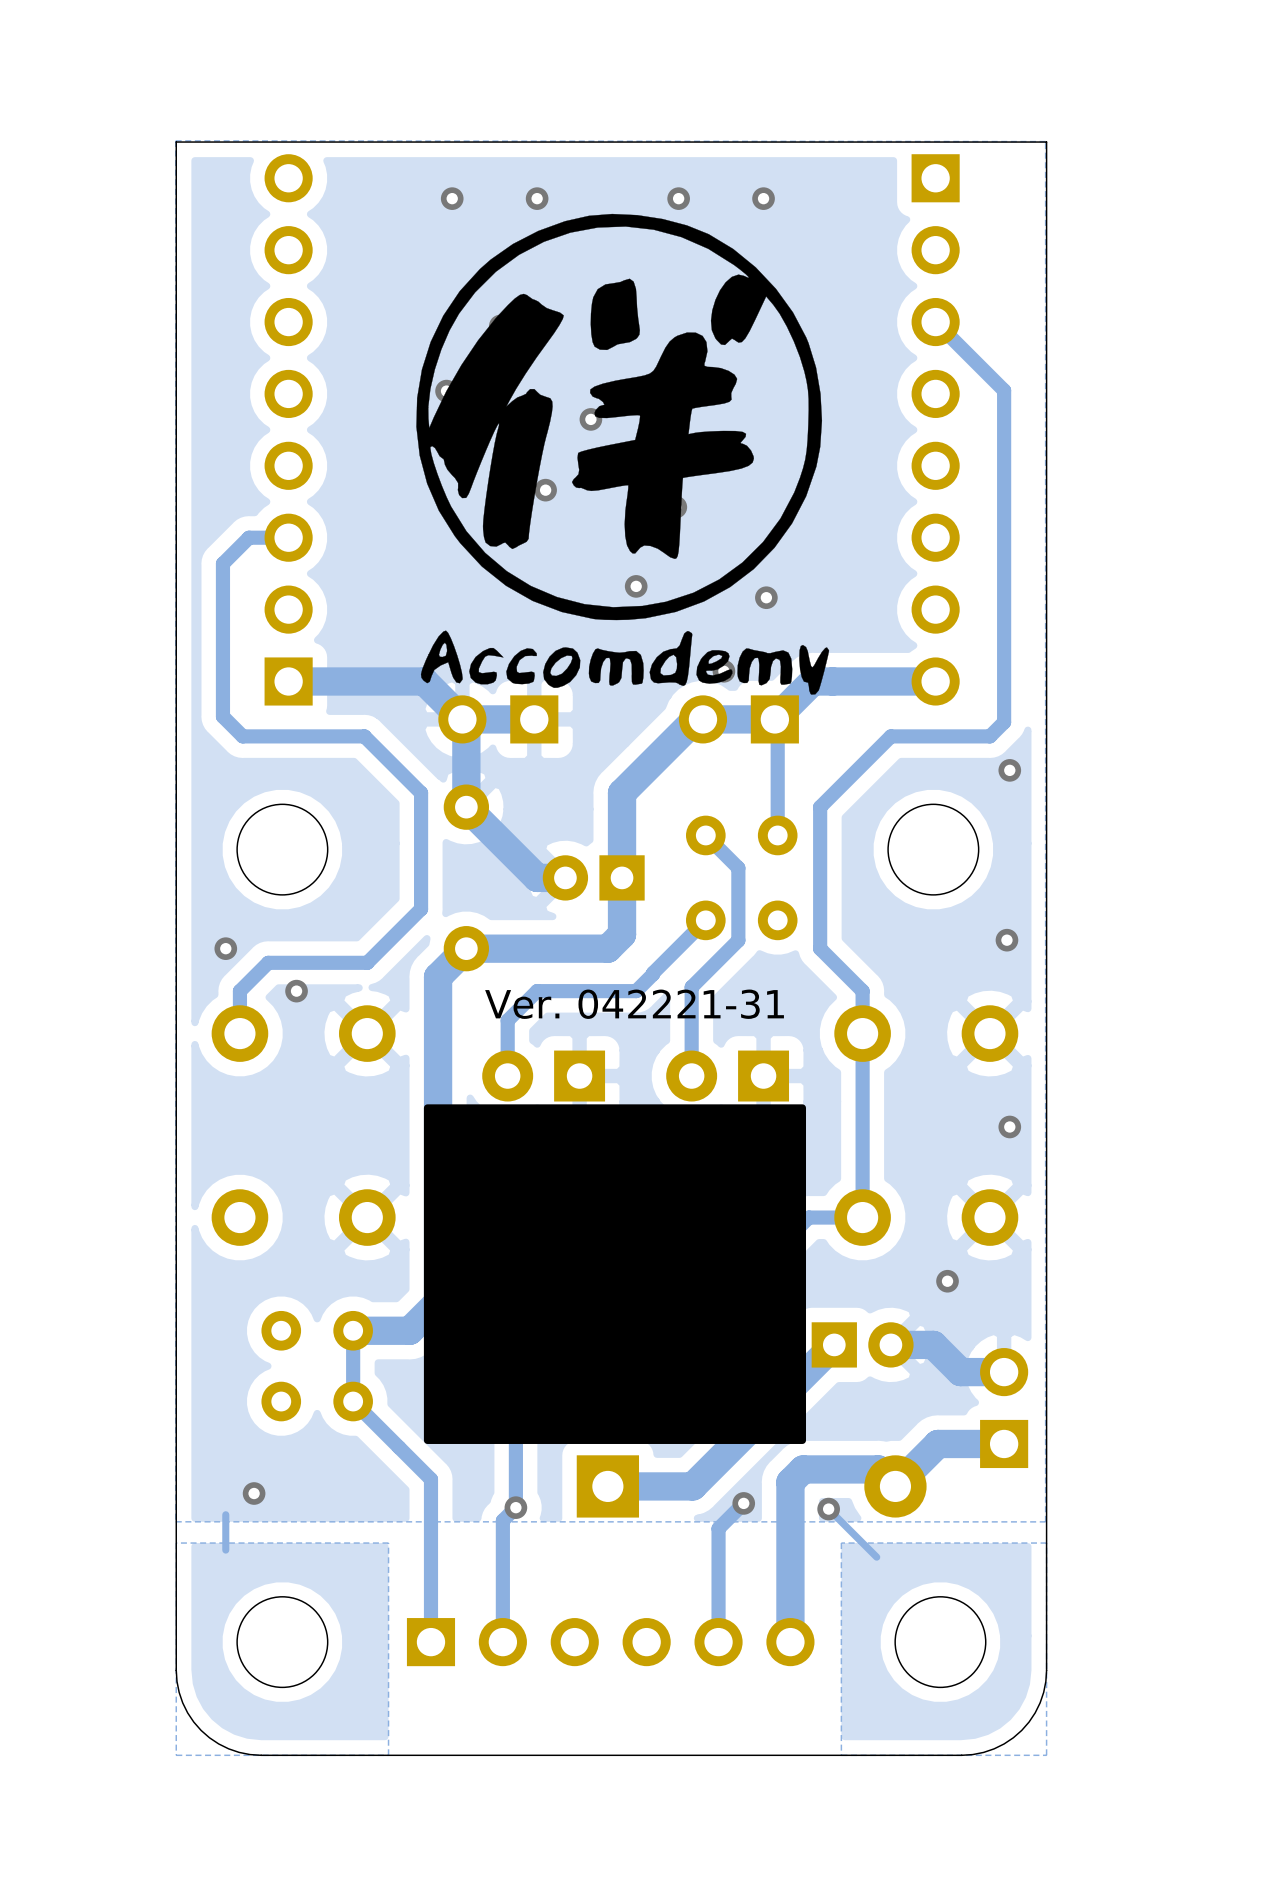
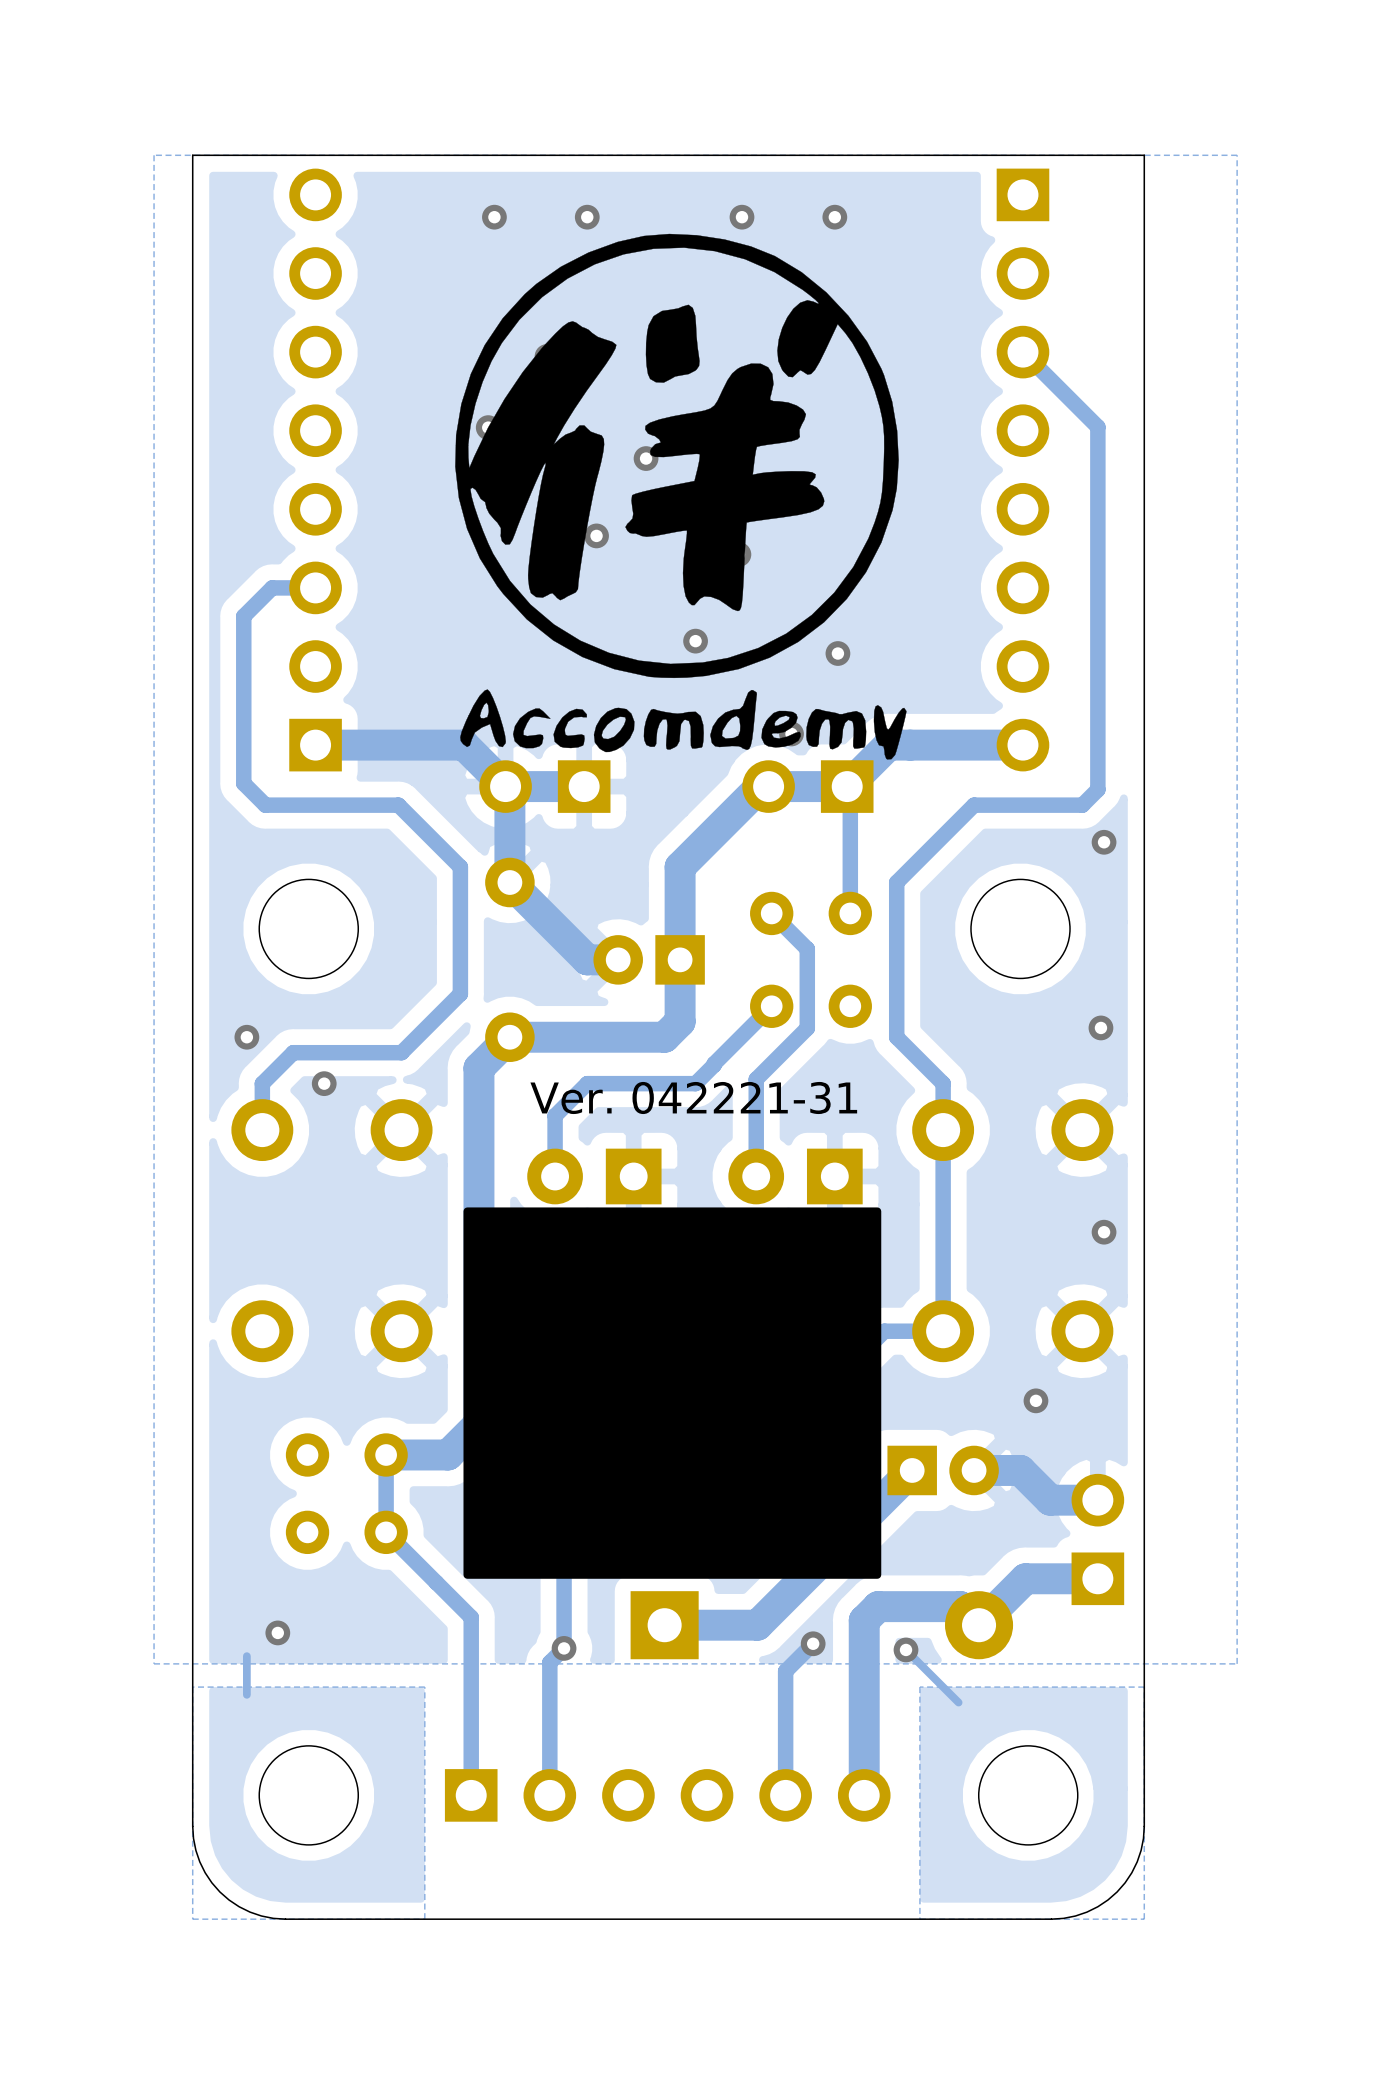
zone outline: (175, 140) (1045, 141) (1045, 1521) (175, 1521) (175, 140) -> (1237, 155) (1237, 1663) (154, 1663) (154, 155) (1237, 155)

